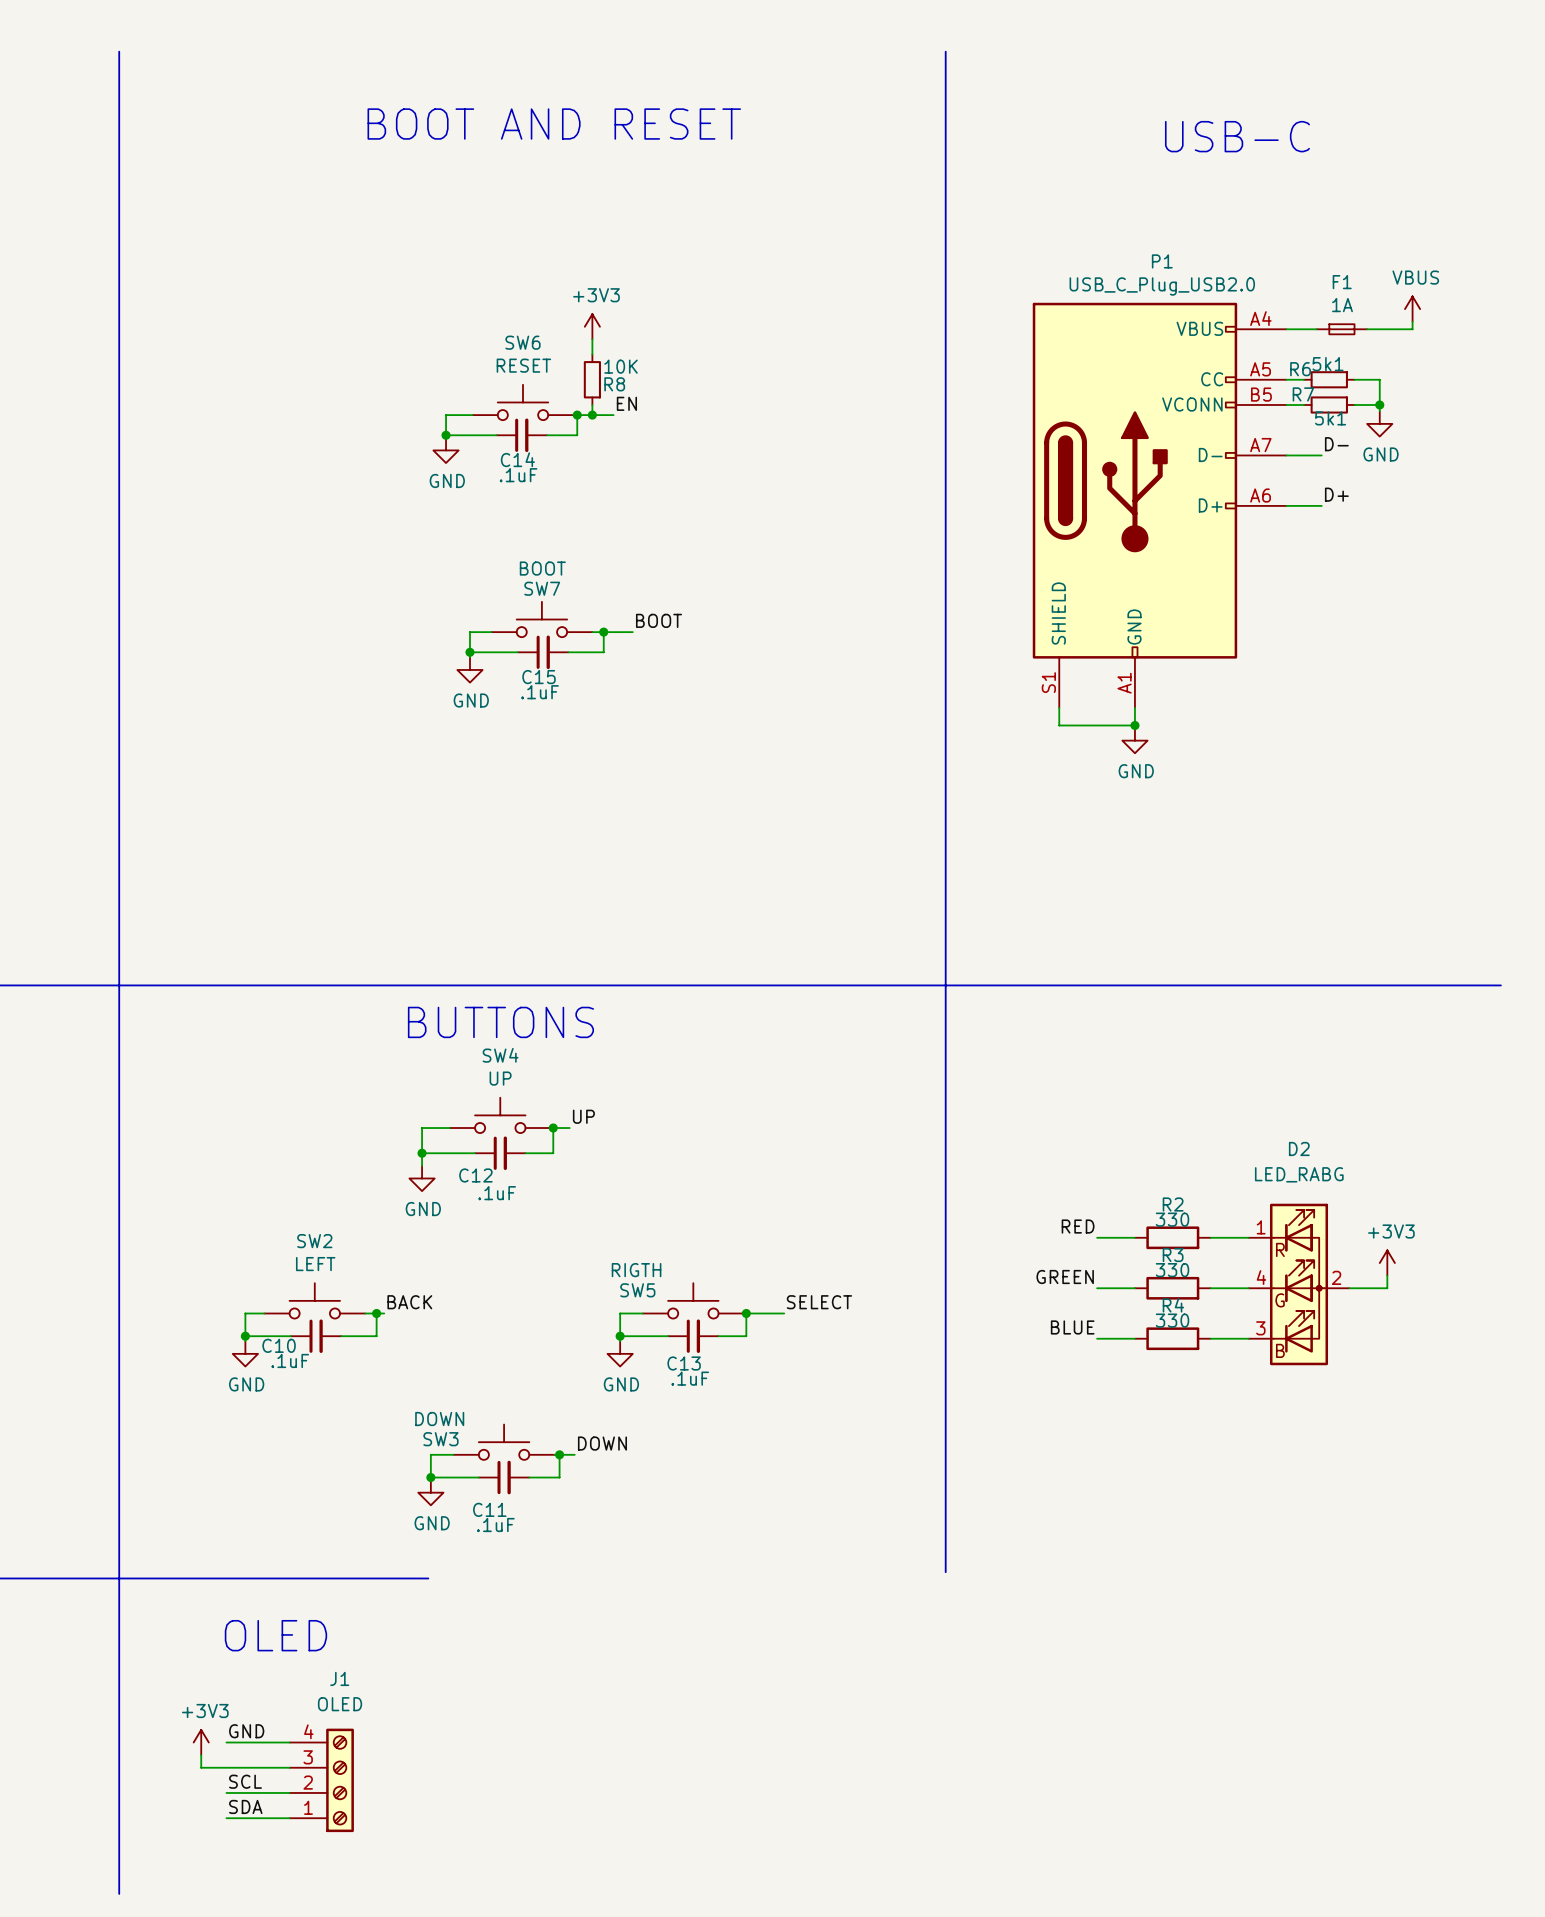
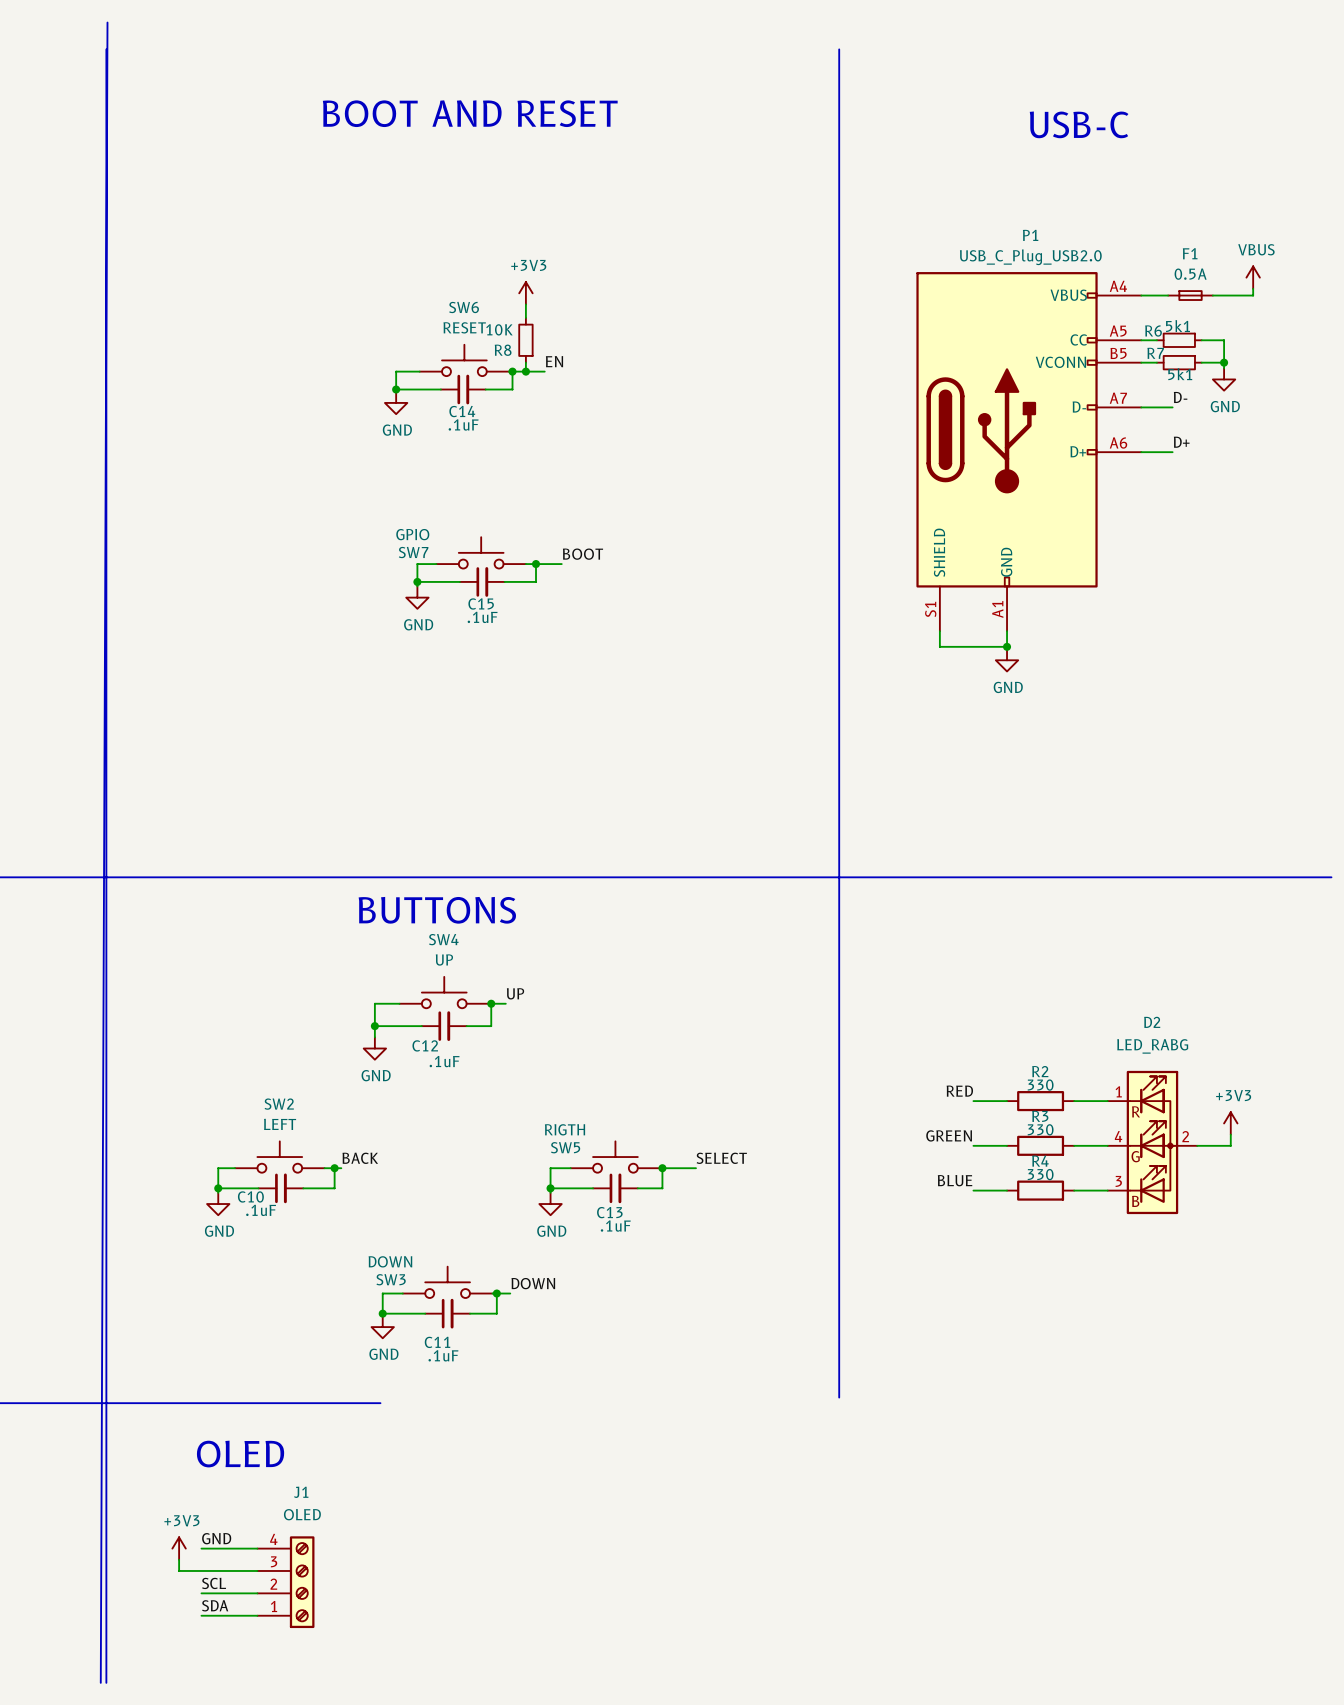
line: none -> (107, 22) (100, 1682)
F1 value: 1A (1342, 305) -> 0.5A (1190, 274)
R8 value position: 10K (621, 366) -> 10K (499, 329)
R8 name position: R8 (614, 384) -> R8 (503, 350)
SW7 value: BOOT (542, 568) -> GPIO (412, 534)
SW7 name position: SW7 (542, 588) -> SW7 (413, 552)

